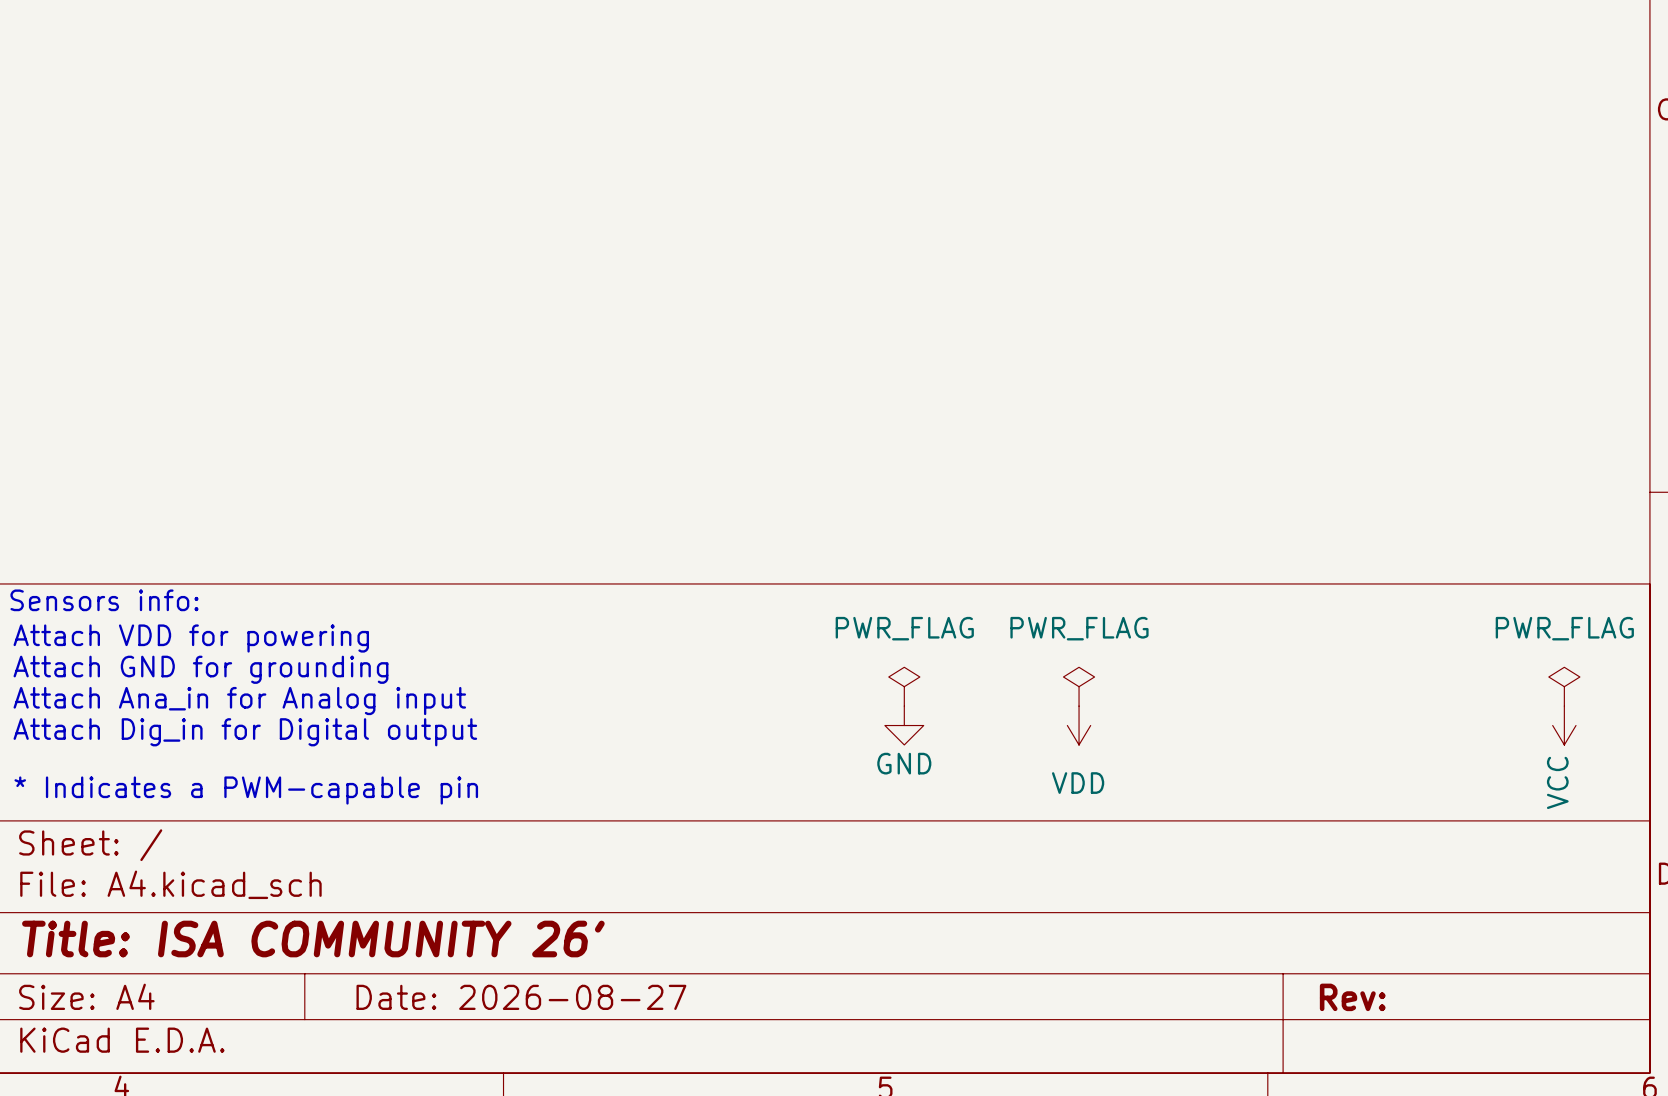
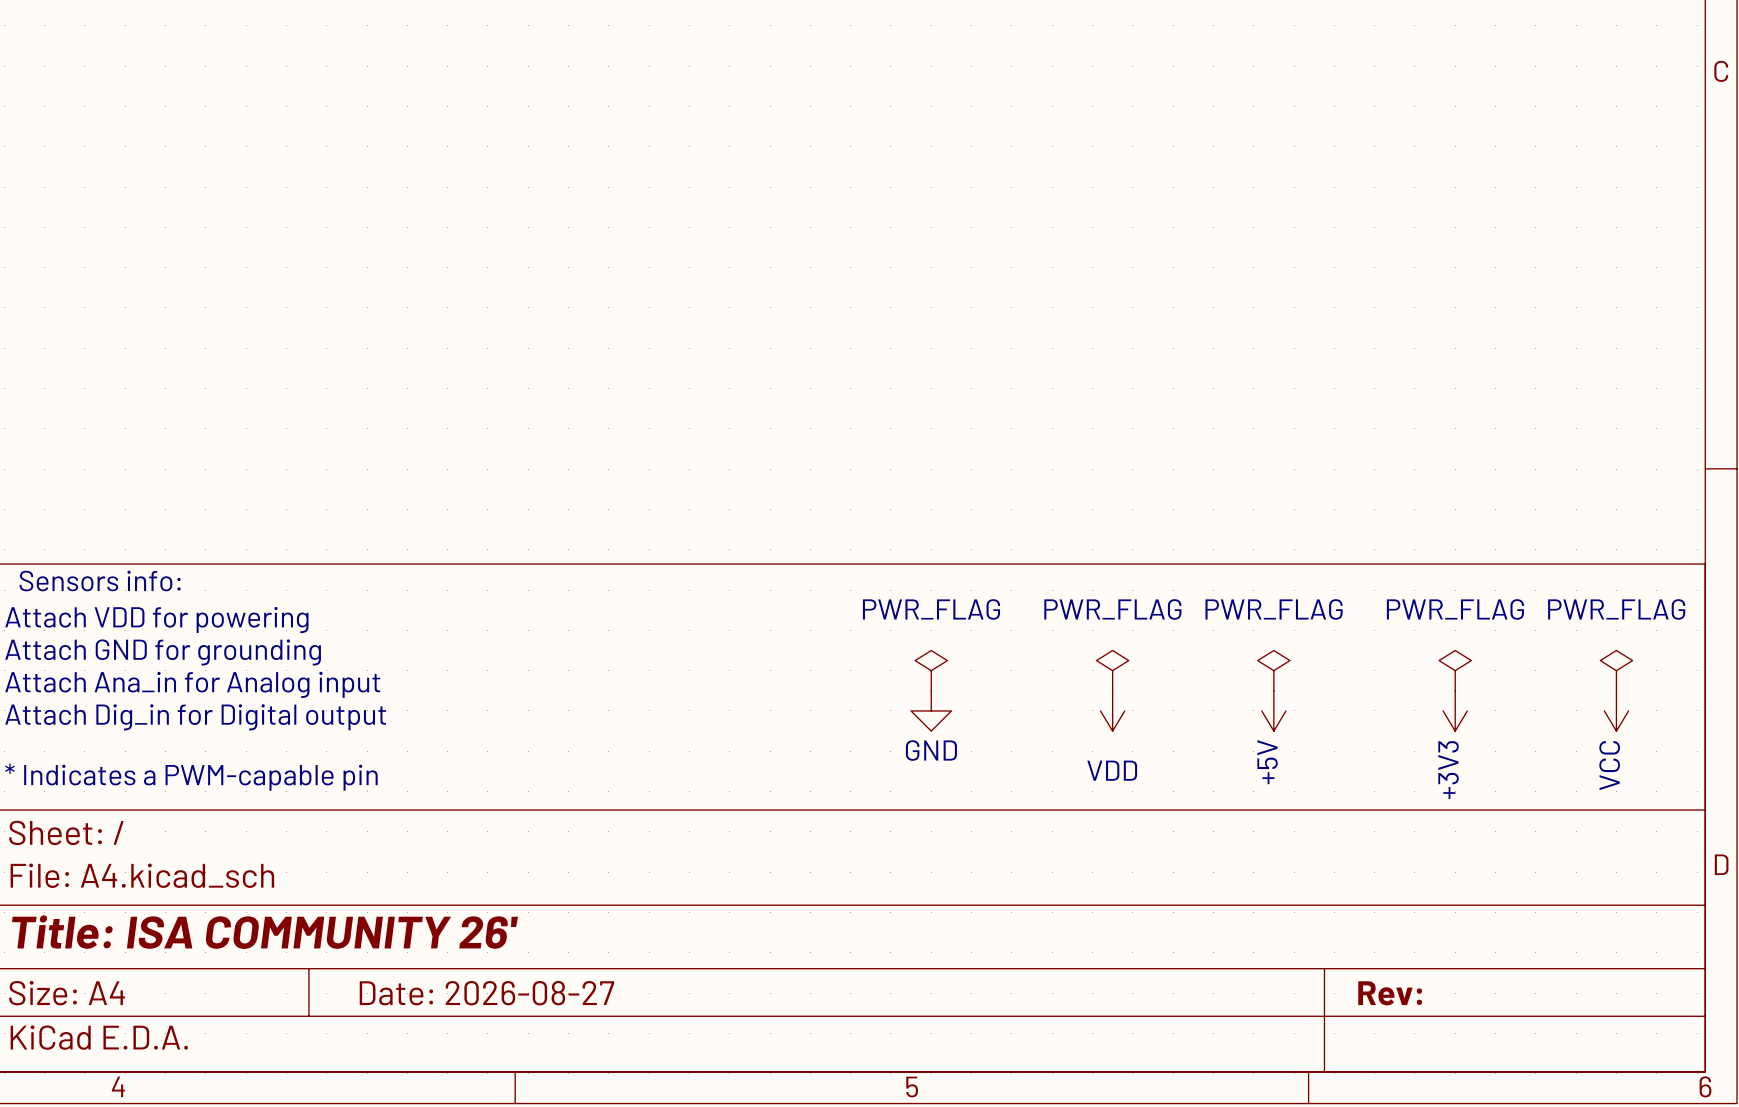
power symbol: none -> PWR_FLAG (1273, 670)
power symbol: none -> PWR_FLAG (1455, 670)
power symbol: none -> +5V (1273, 710)
power symbol: none -> +3V3 (1455, 710)

